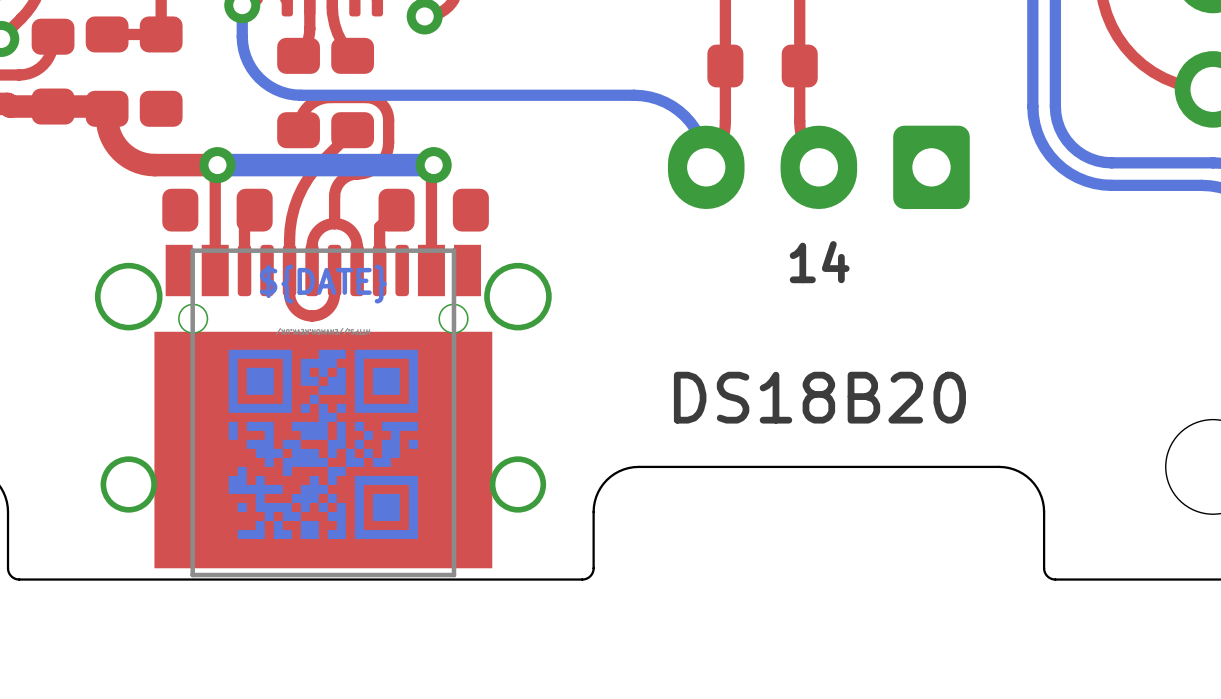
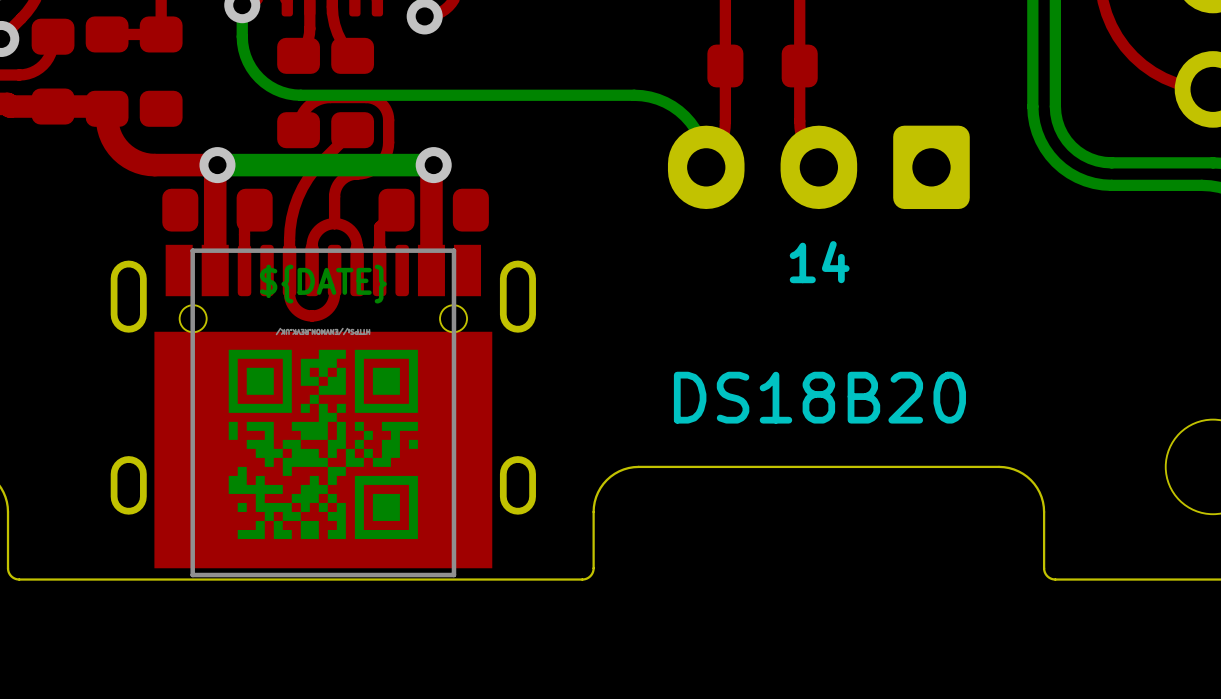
top track width: thin (215, 167) (215, 270) -> thick (215, 167) (215, 270)
top track width: thin (431, 167) (431, 270) -> thick (431, 167) (431, 270)
part footprint: [94, 244, 552, 569] -> [110, 244, 536, 569]

